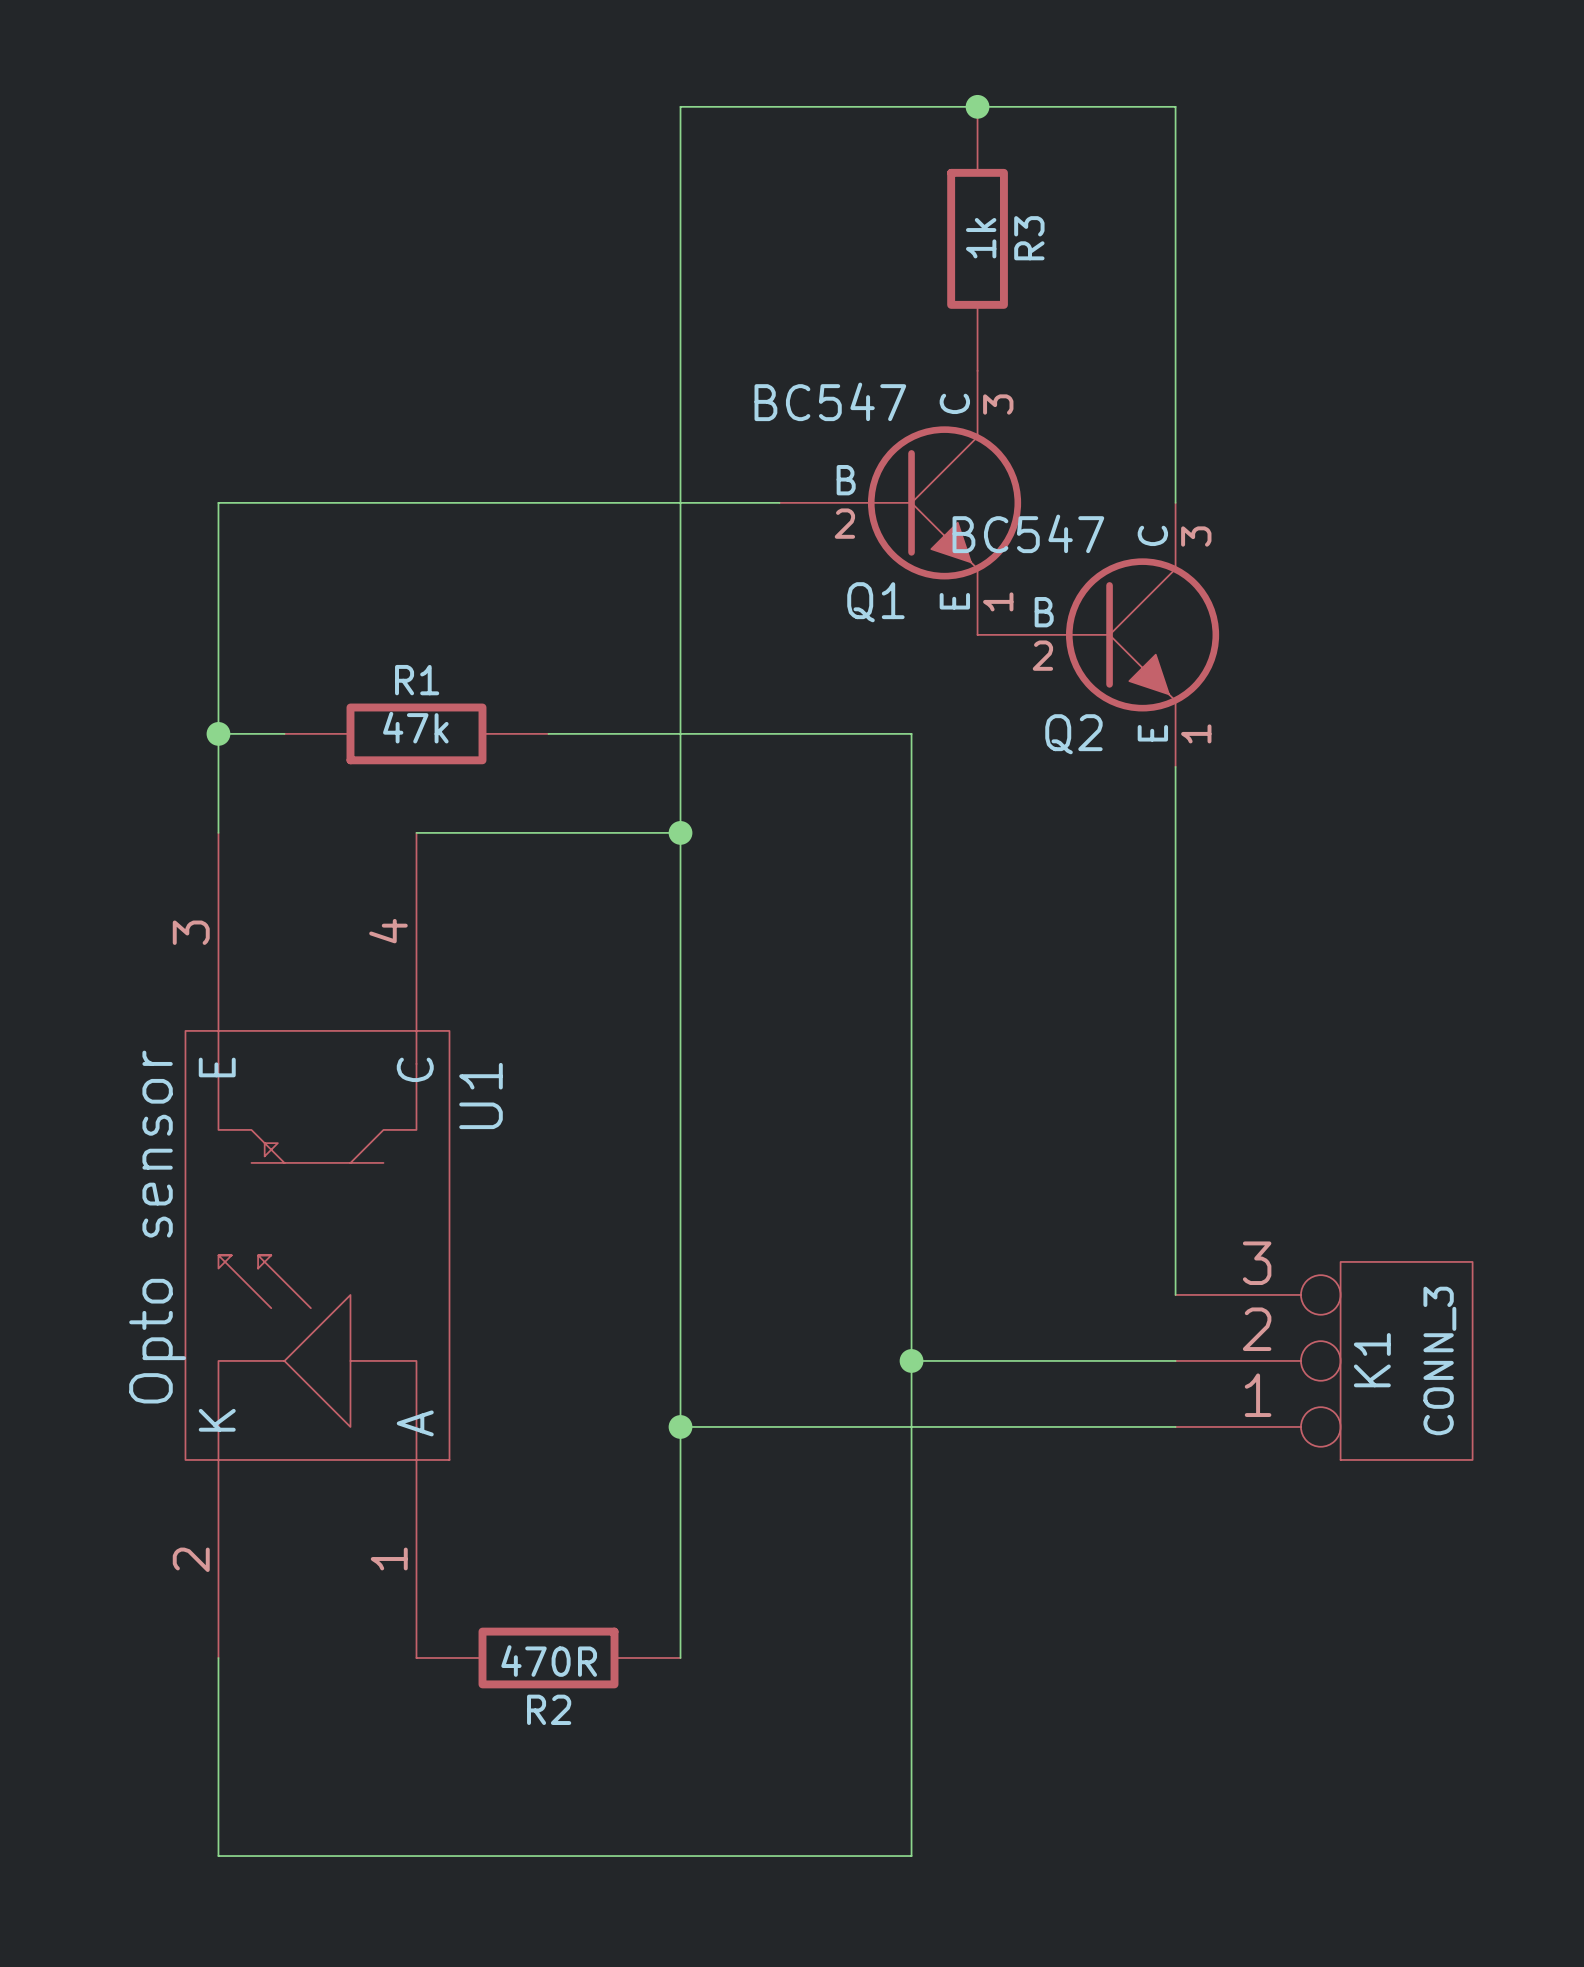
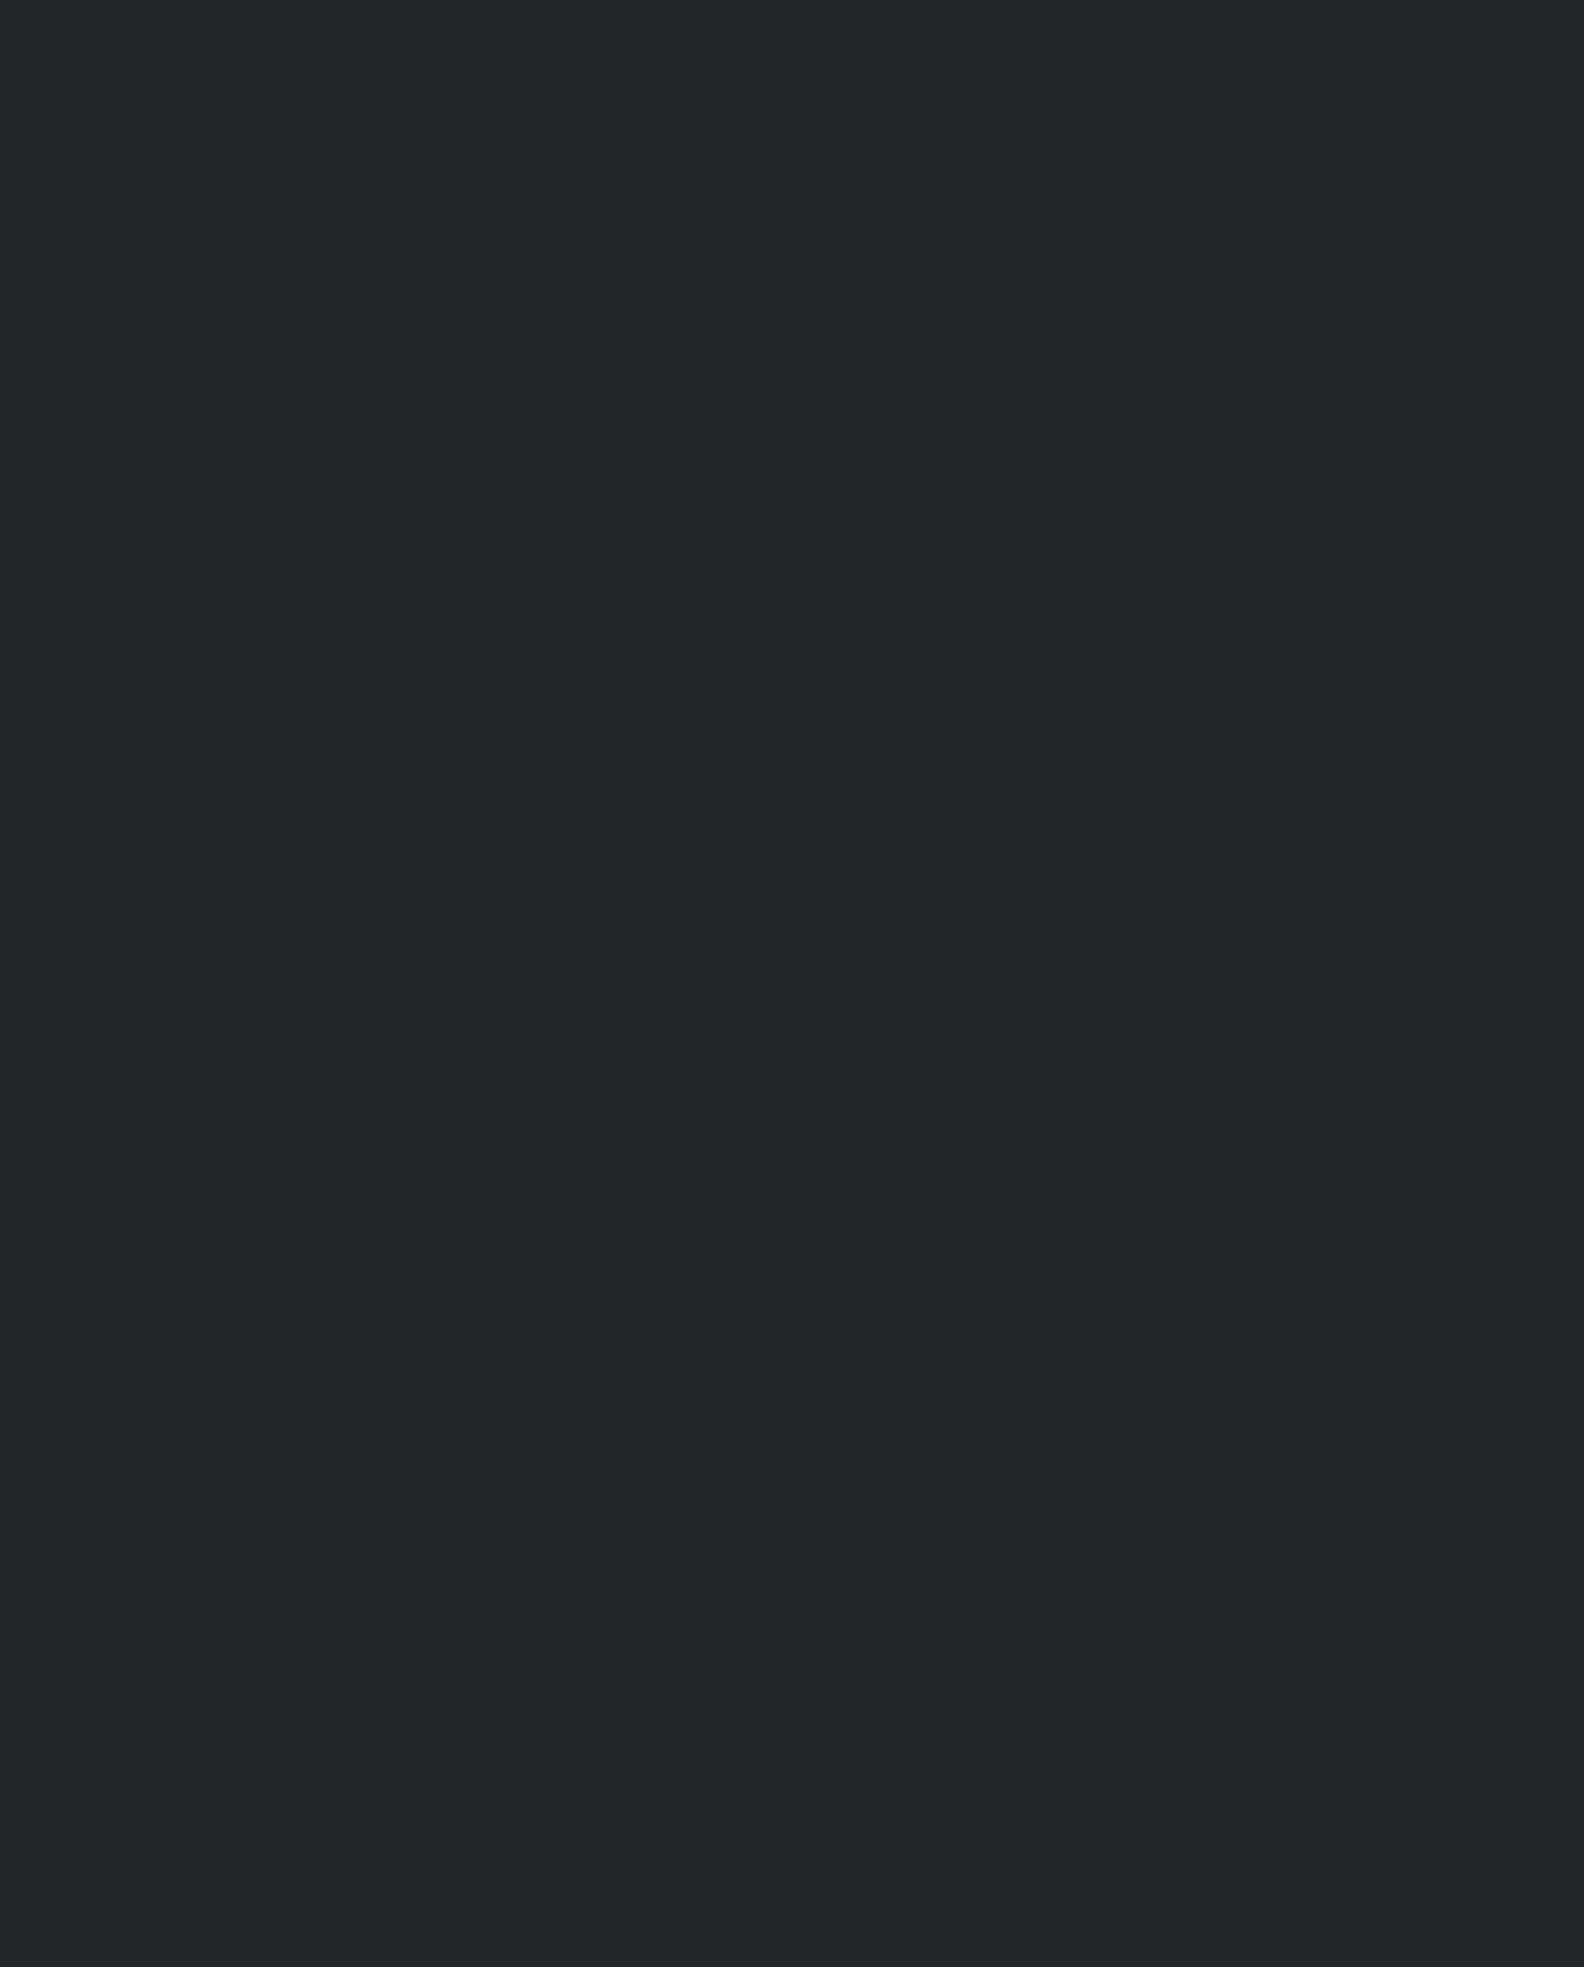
junction: (977, 106) -> none
R3: 1k (977, 238) -> none
wire: (779, 502) (218, 502) (218, 832) -> none
Q1: BC547 (900, 502) -> none
wire: (1175, 502) (1175, 106) (680, 106) (680, 1658) -> none
Q2: BC547 (1098, 634) -> none
wire: (218, 733) (284, 733) -> none
junction: (218, 733) -> none
R1: 47k (416, 733) -> none
wire: (548, 733) (911, 733) (911, 1856) (218, 1856) (218, 1658) -> none
wire: (1175, 766) (1175, 1294) -> none
wire: (416, 832) (680, 832) -> none
junction: (680, 832) -> none
U1: Opto sensor (317, 1245) -> none
wire: (911, 1360) (1175, 1360) -> none
junction: (911, 1360) -> none
K1: CONN_3 (1324, 1360) -> none
wire: (680, 1426) (1175, 1426) -> none
junction: (680, 1426) -> none
R2: 470R (548, 1658) -> none

